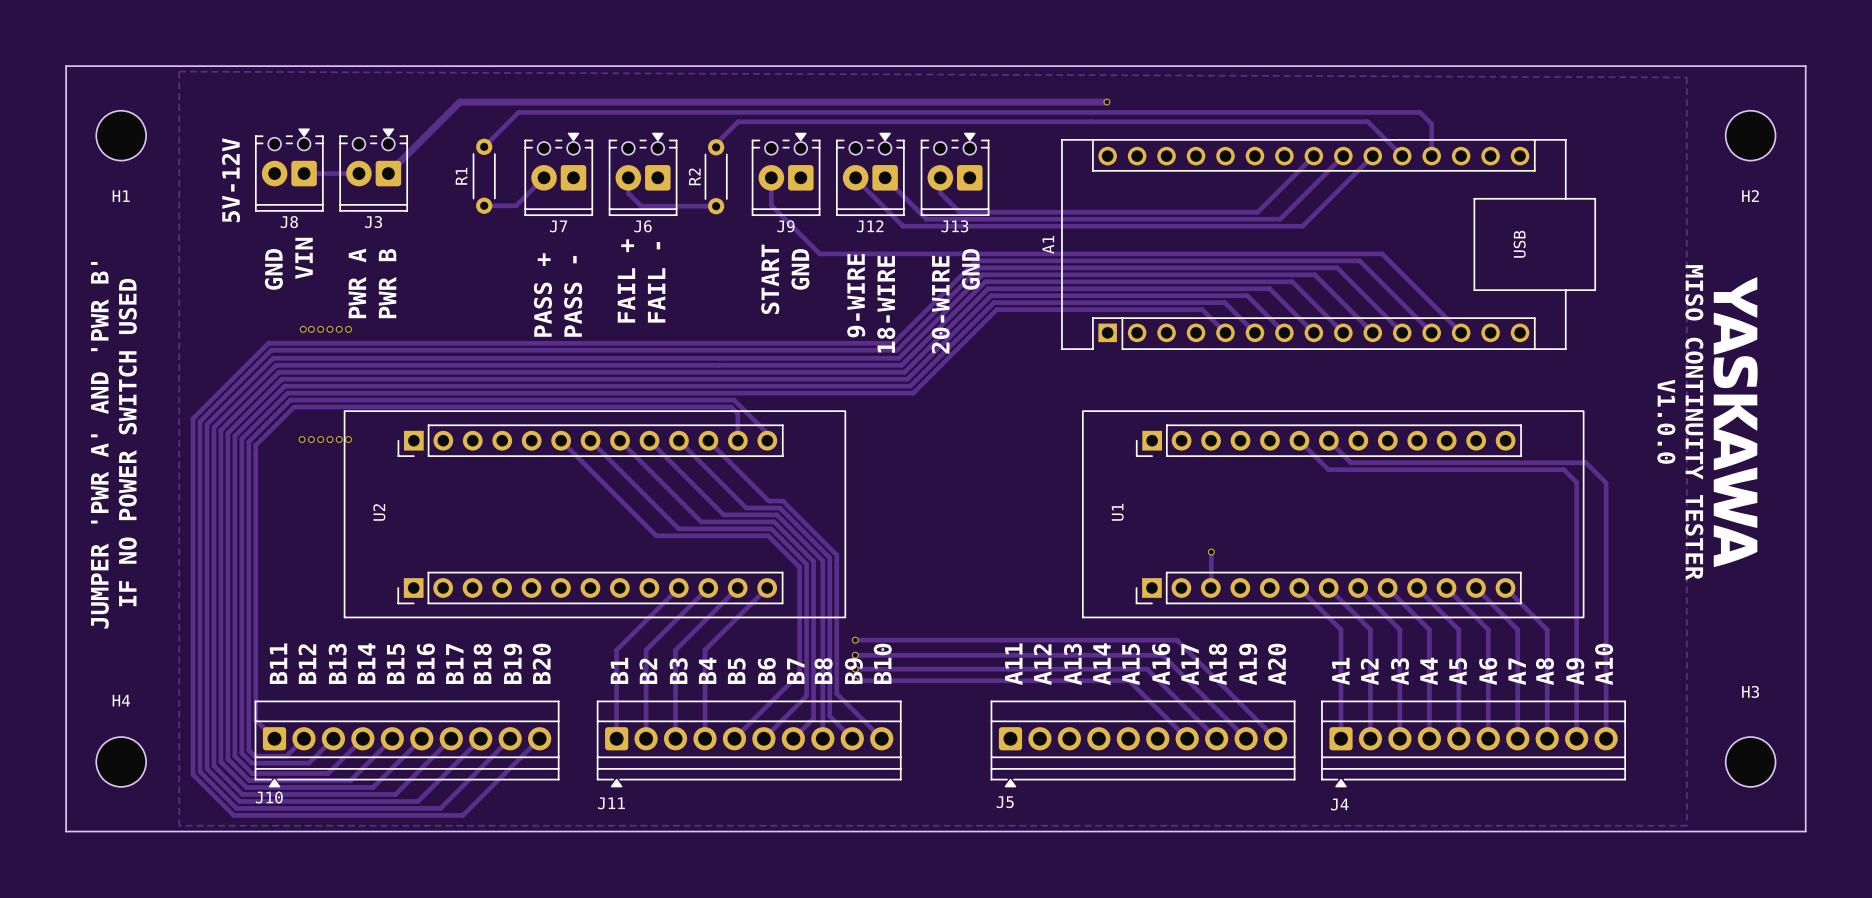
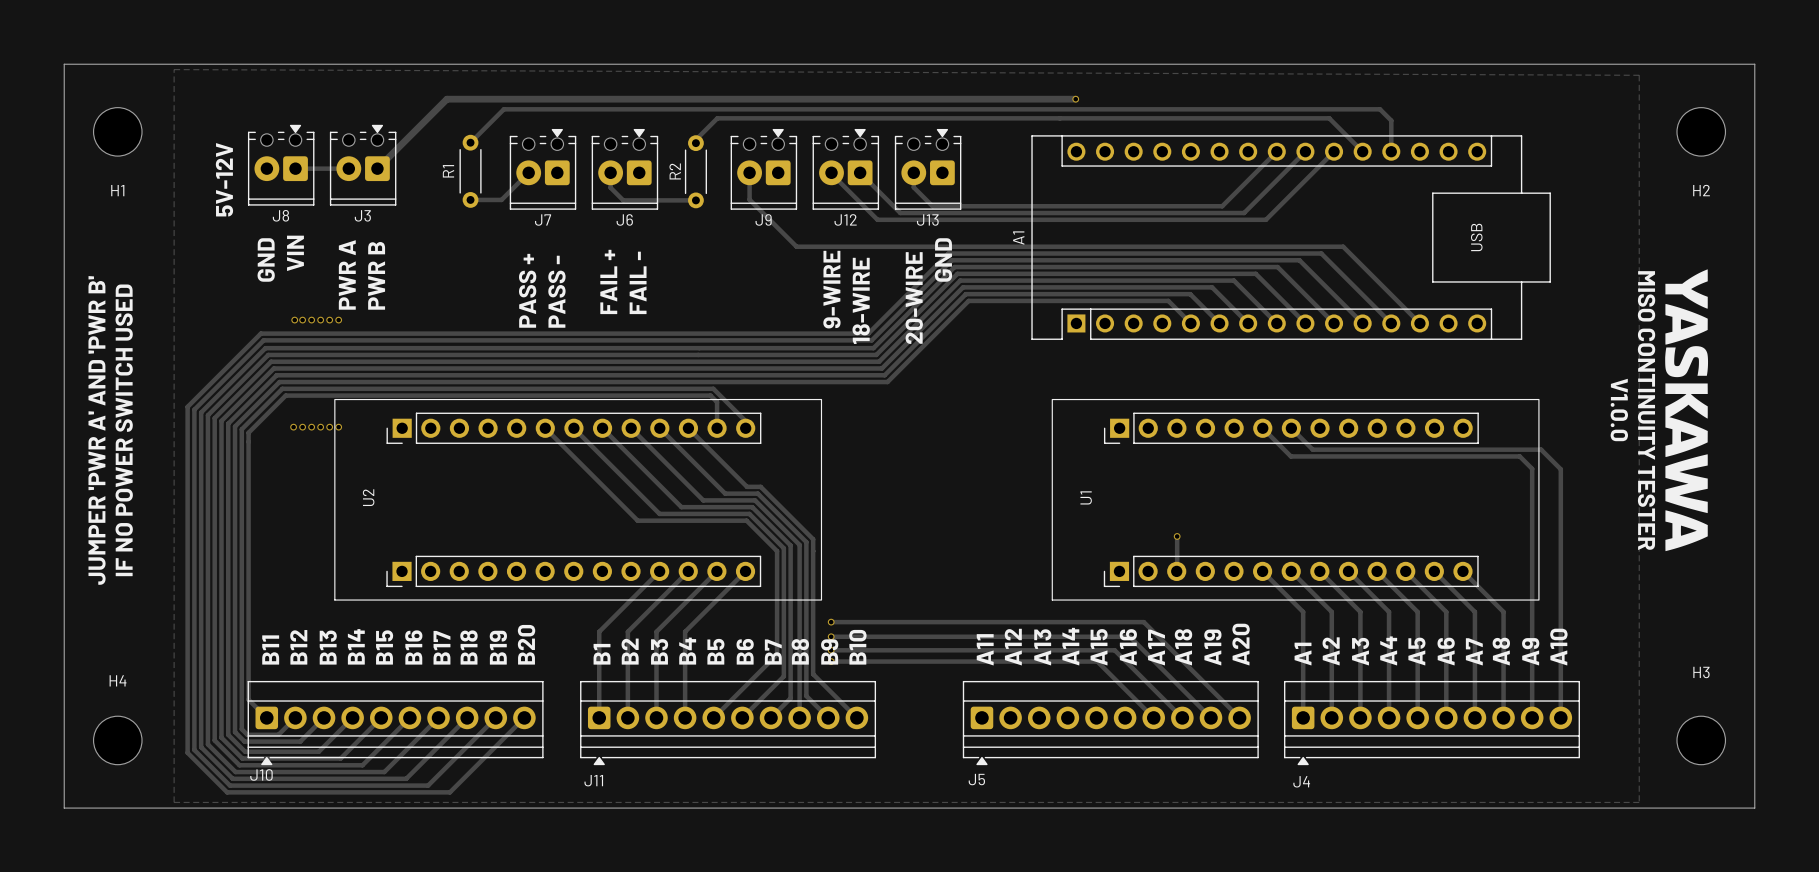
text: GND (800, 269) -> none
text: START (770, 279) -> none

